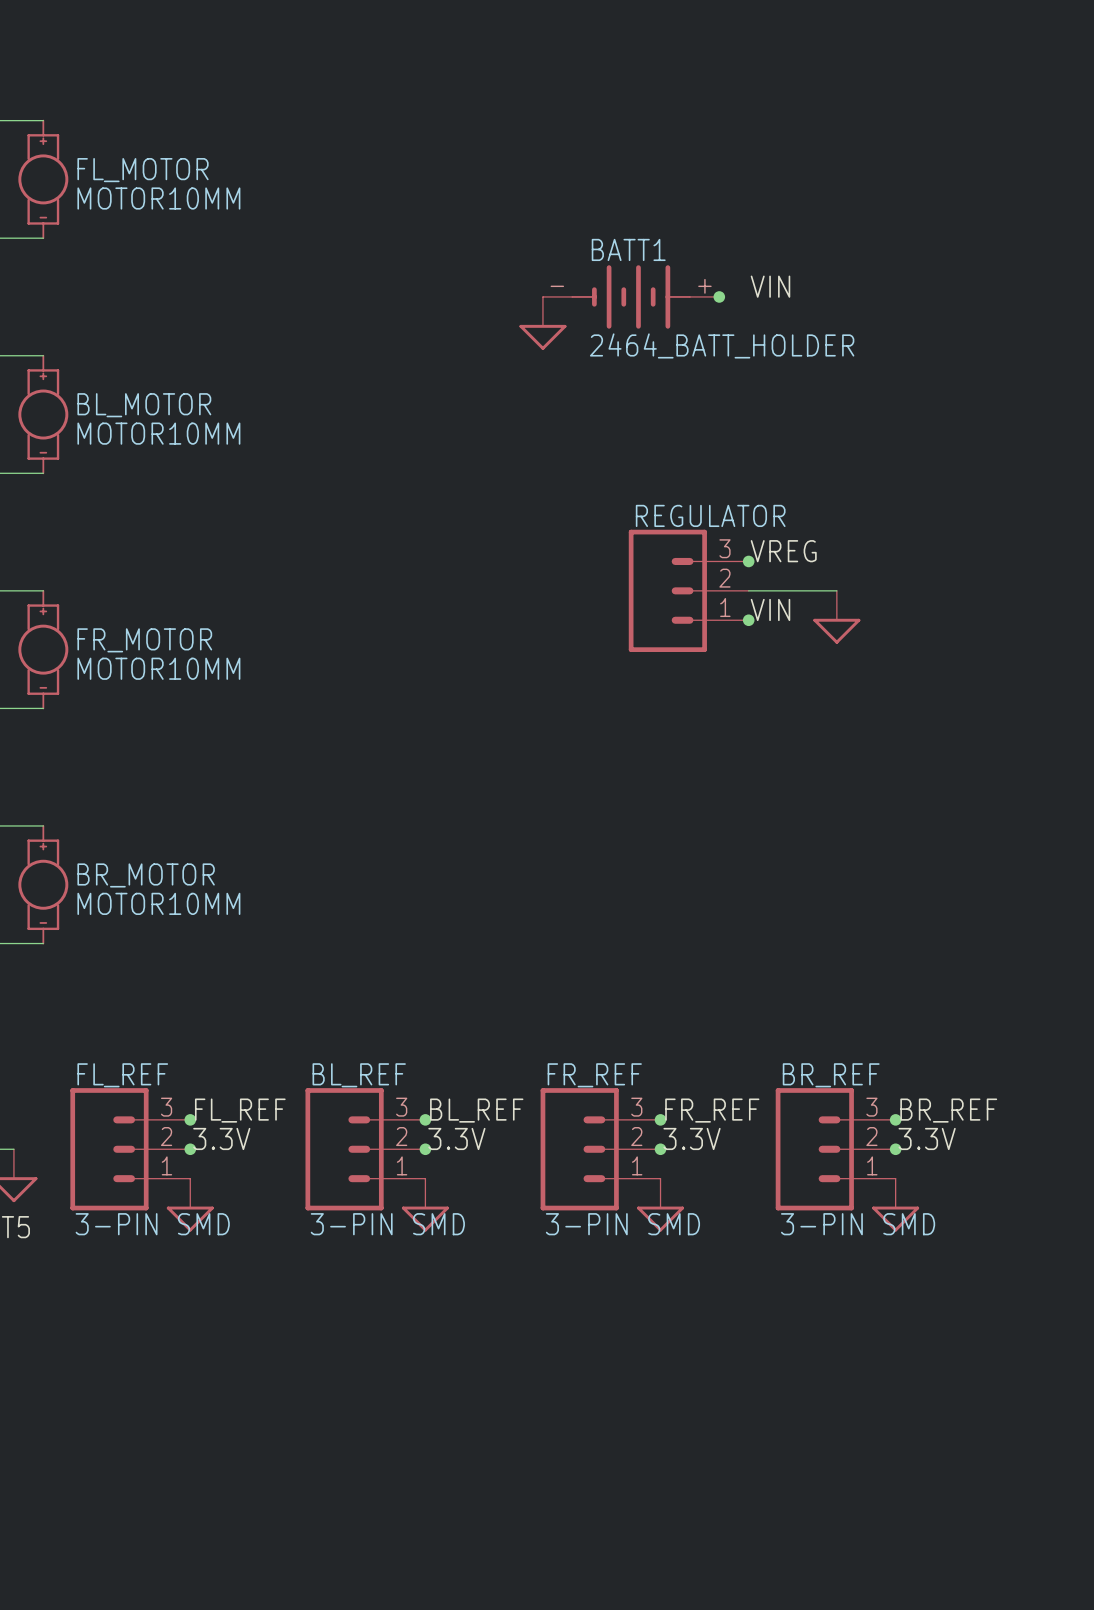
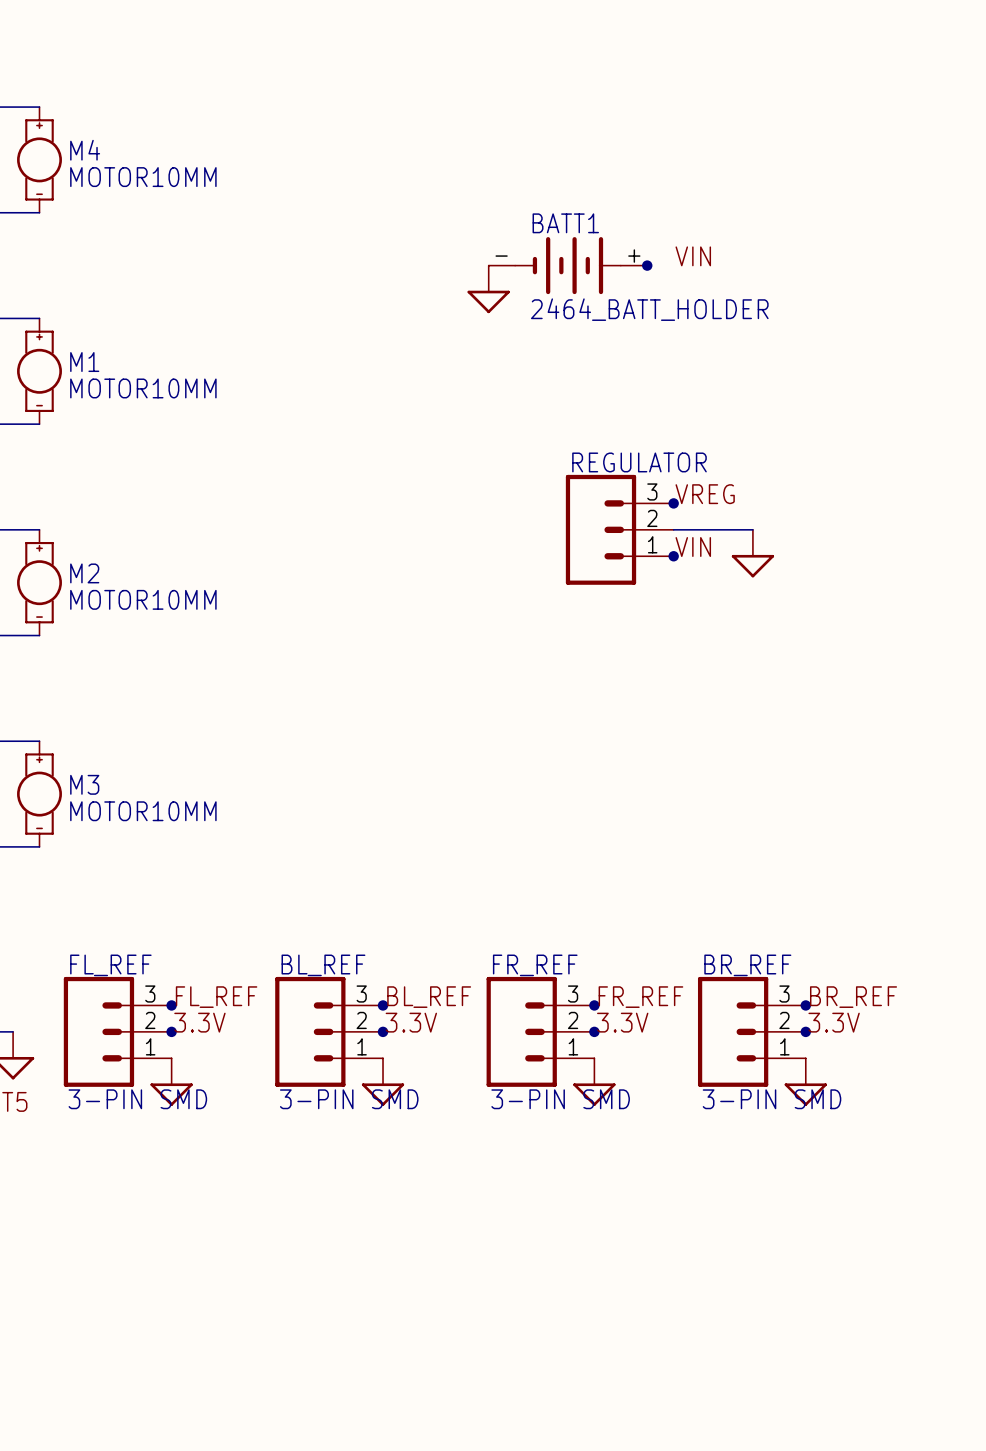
FL_MOTOR name: FL_MOTOR (143, 170) -> M4 (85, 150)
BL_MOTOR name: BL_MOTOR (144, 405) -> M1 (84, 362)
FR_MOTOR name: FR_MOTOR (144, 640) -> M2 (84, 573)
BR_MOTOR name: BR_MOTOR (146, 875) -> M3 (84, 784)

